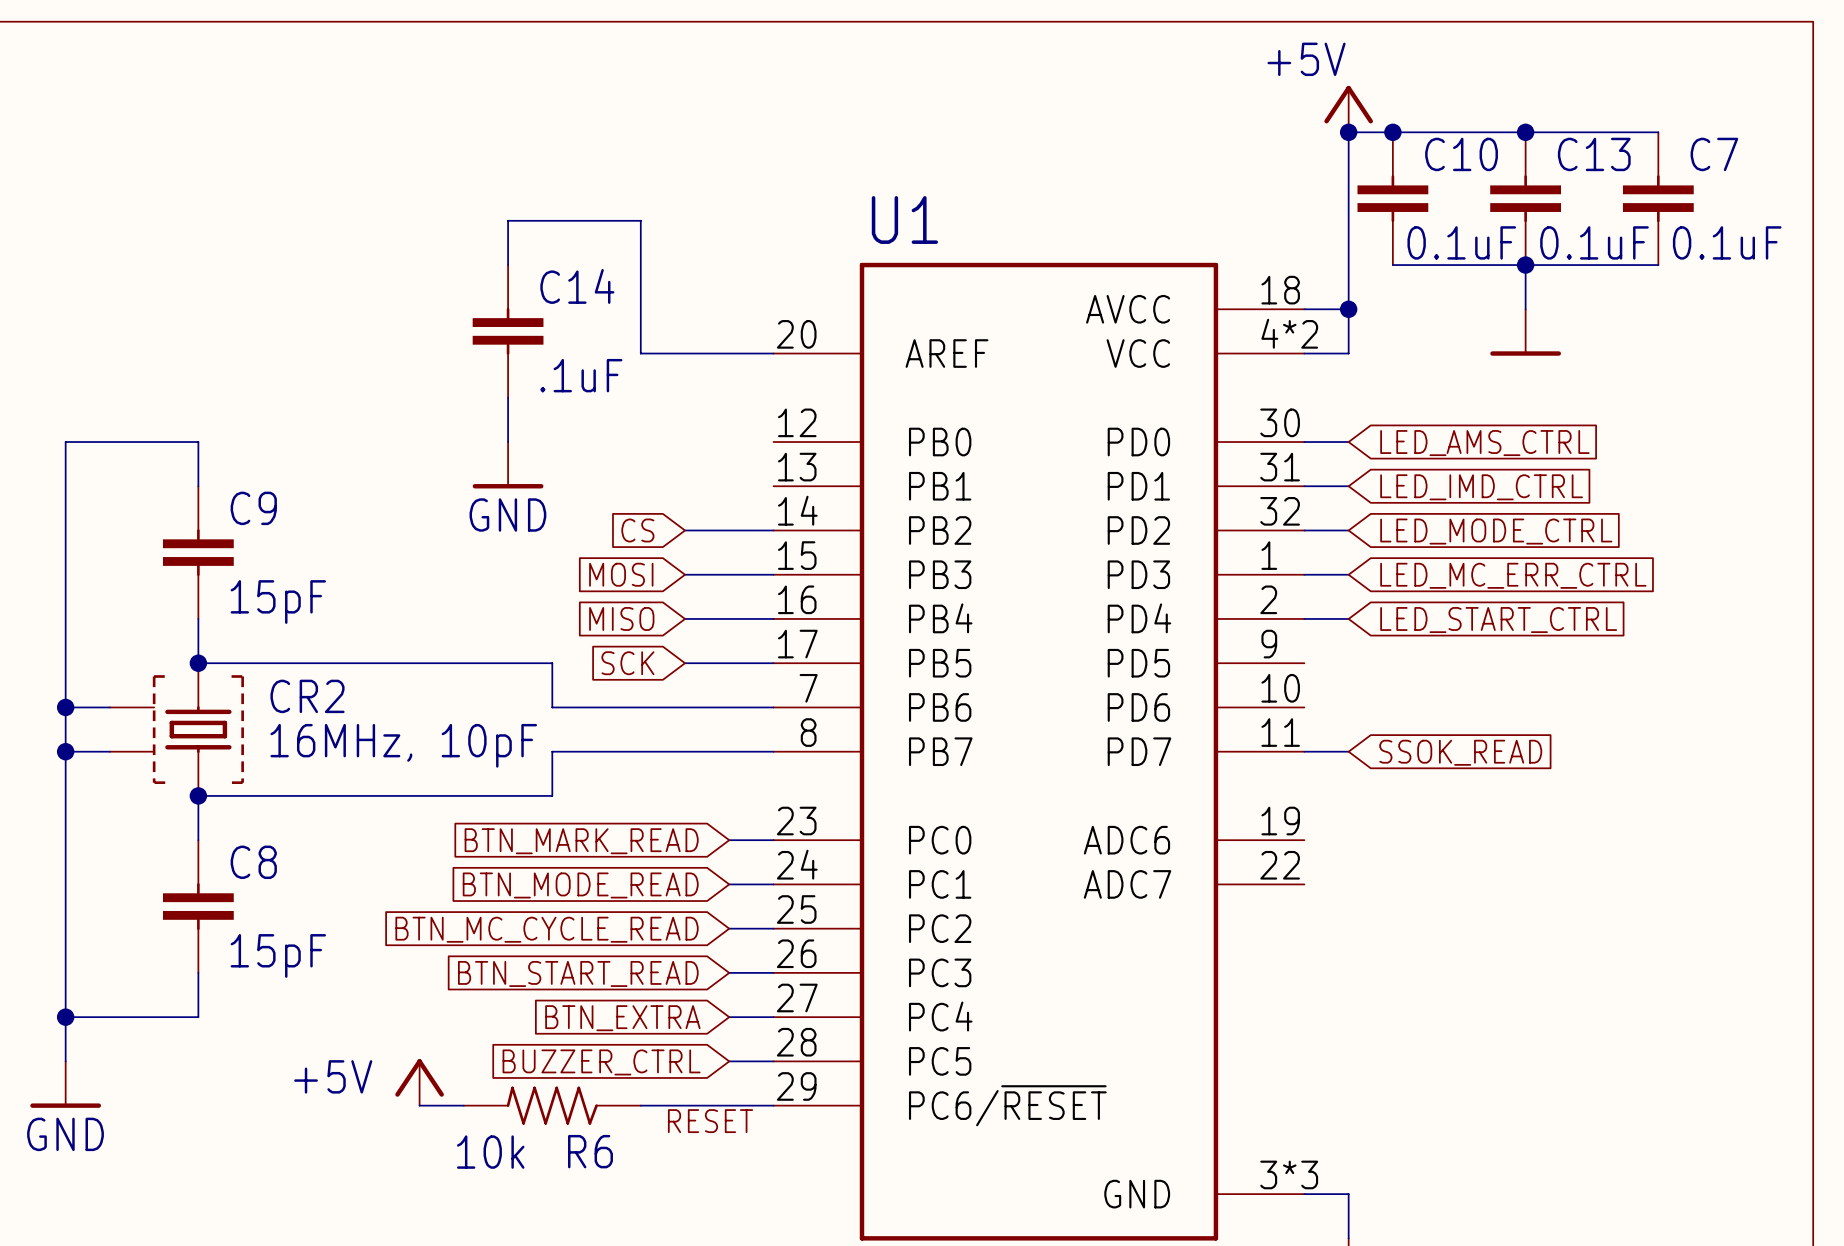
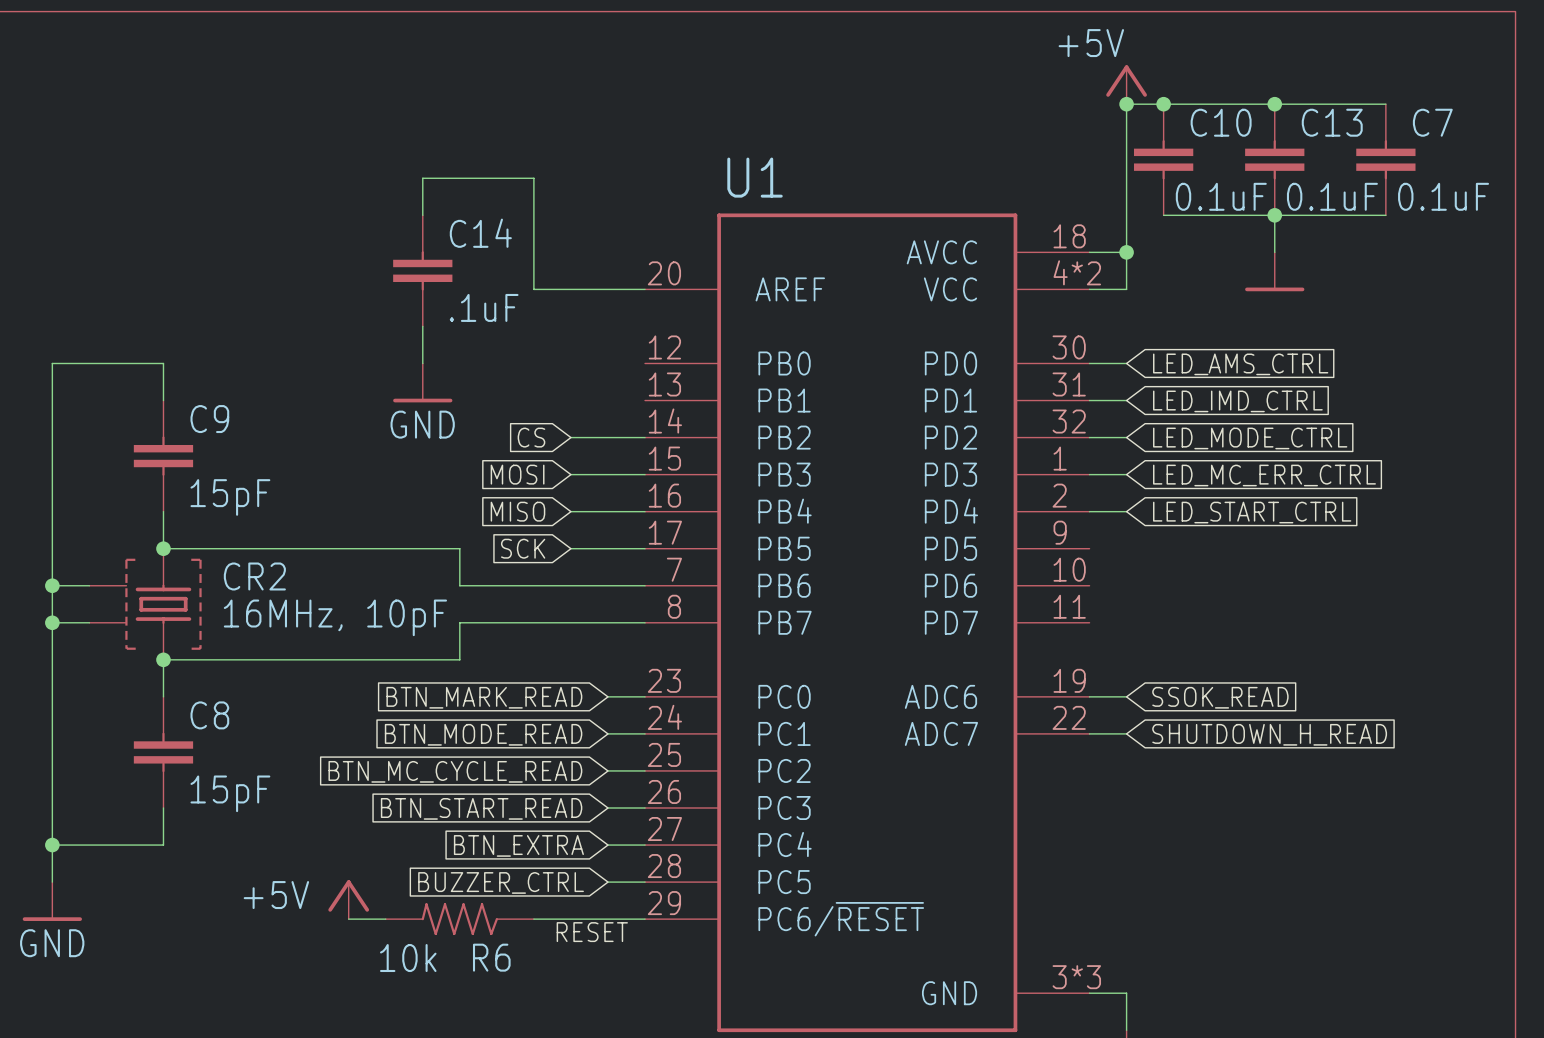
wire: (1304, 751) (1348, 751) -> (1089, 696) (1126, 696)
global label position: SSOK_READ (1460, 752) -> SSOK_READ (1220, 697)
wire: none -> (1089, 733) (1126, 733)
global label: none -> SHUTDOWN_H_READ (1269, 734)

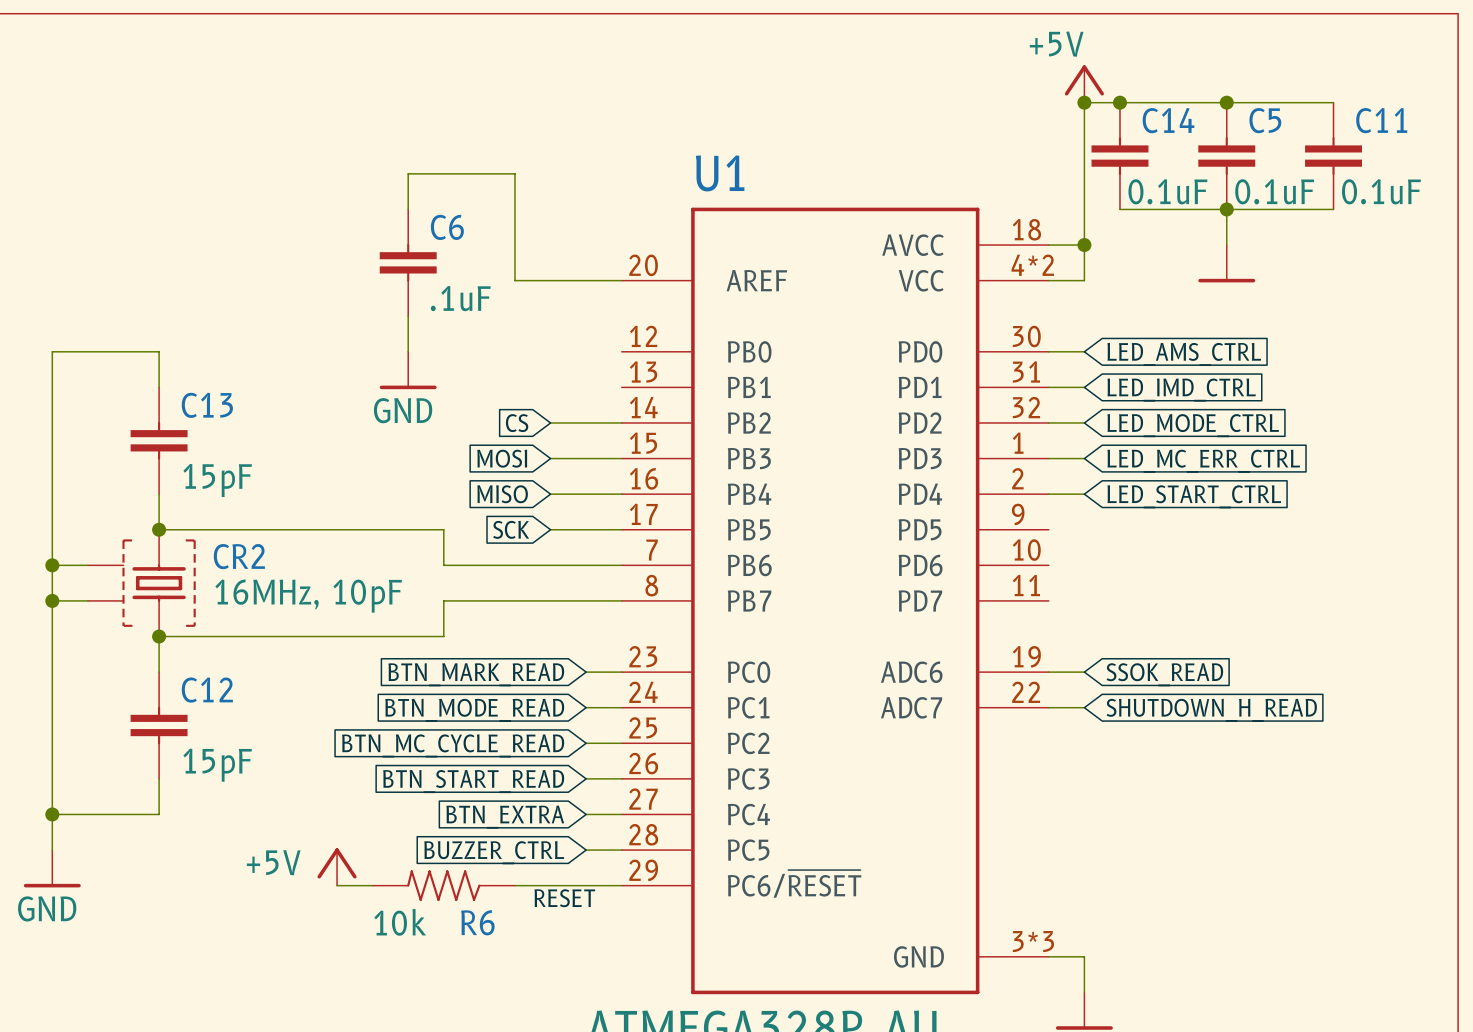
C10 name: C10 (1221, 122) -> C14 (1168, 120)
C13 name: C13 (1332, 122) -> C5 (1265, 120)
C7 name: C7 (1432, 122) -> C11 (1381, 120)
C14 name: C14 (480, 233) -> C6 (447, 227)
C9 name: C9 (209, 419) -> C13 (207, 405)
C8 name: C8 (209, 715) -> C12 (207, 690)

